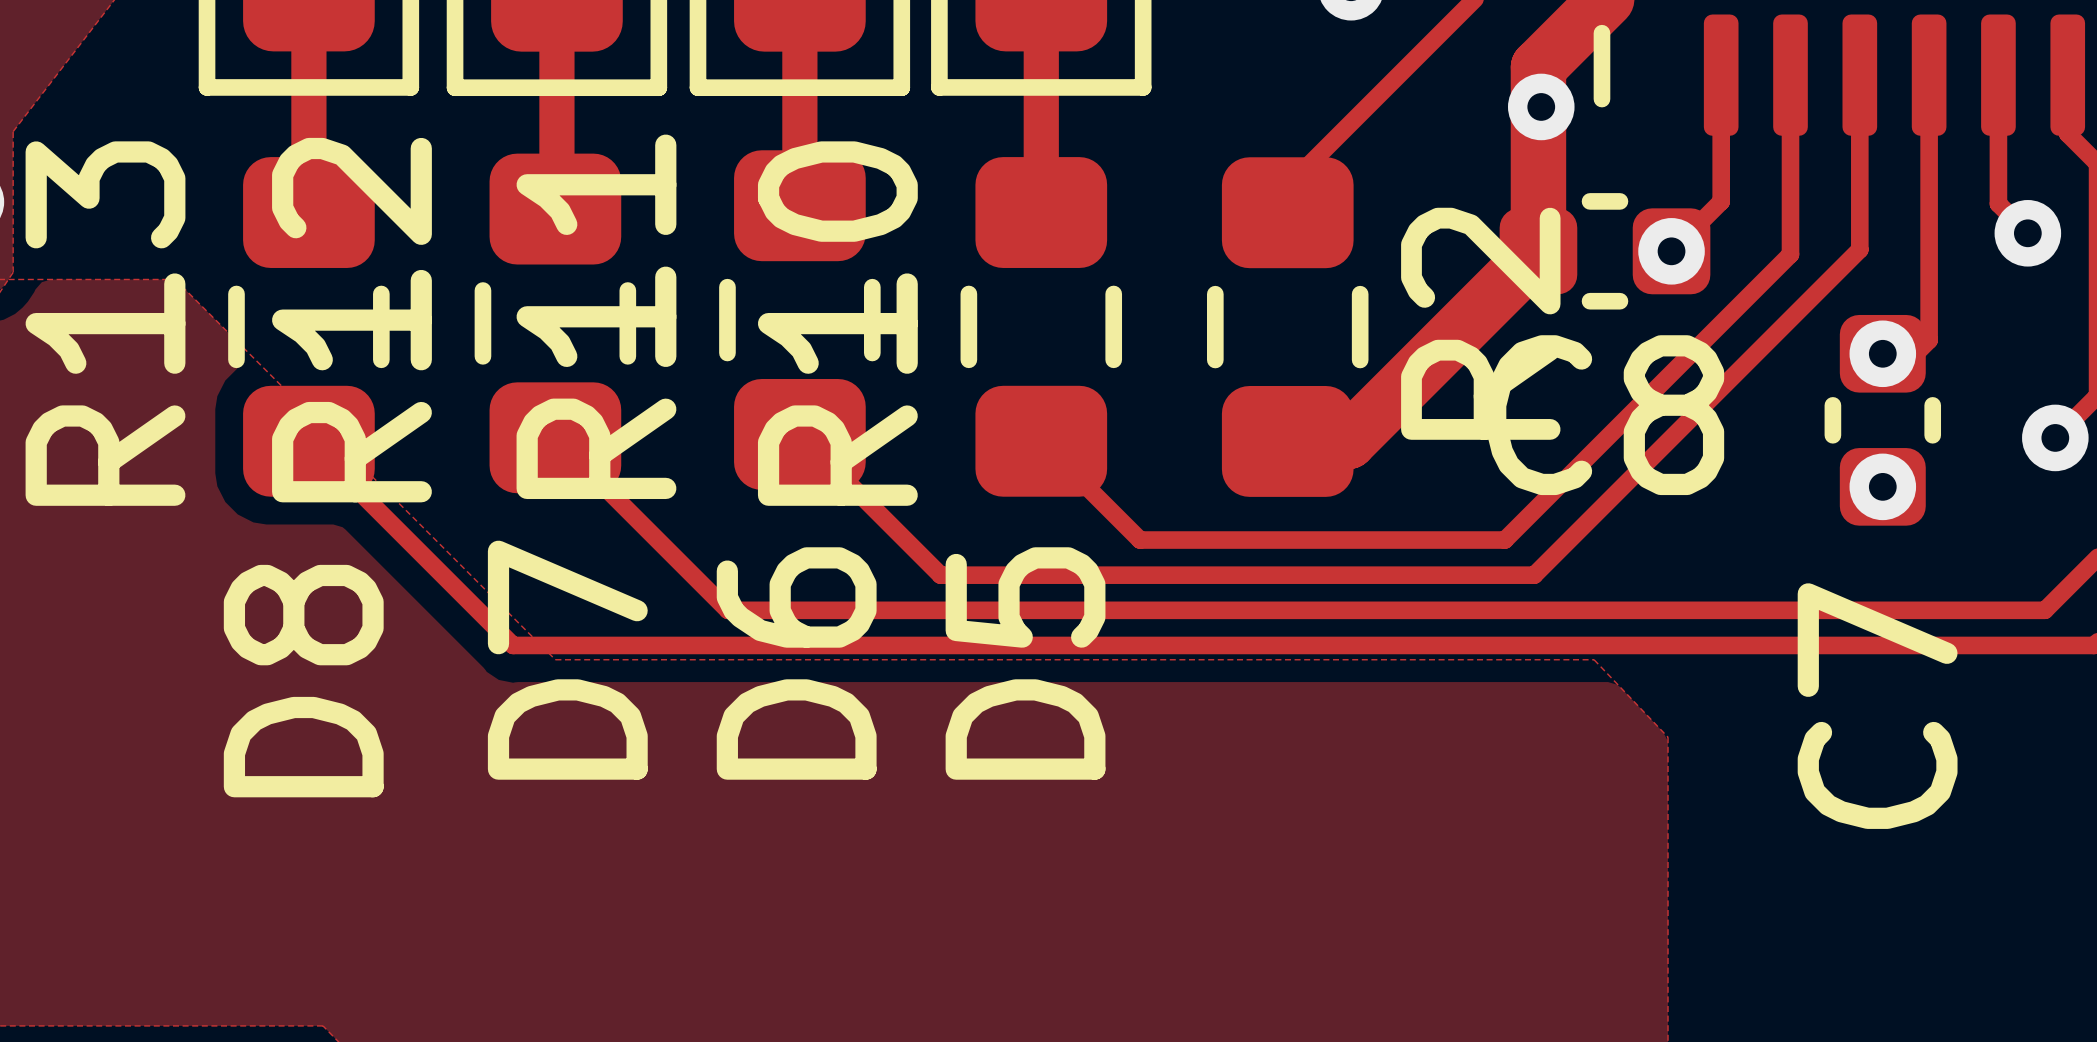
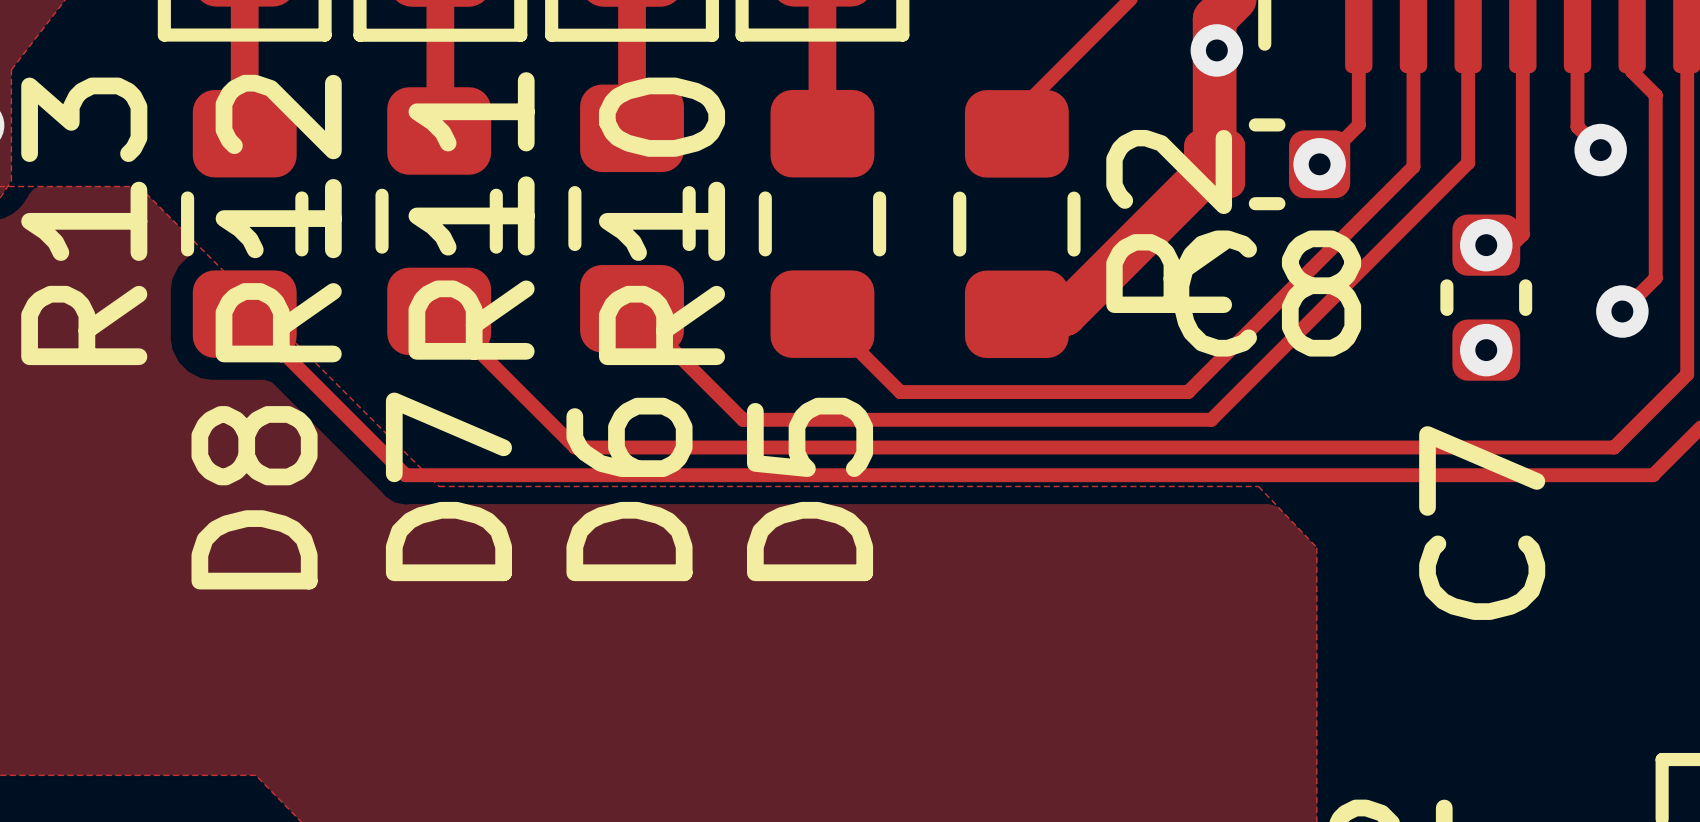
D8 name position: D8 (303, 681) -> D8 (254, 497)

